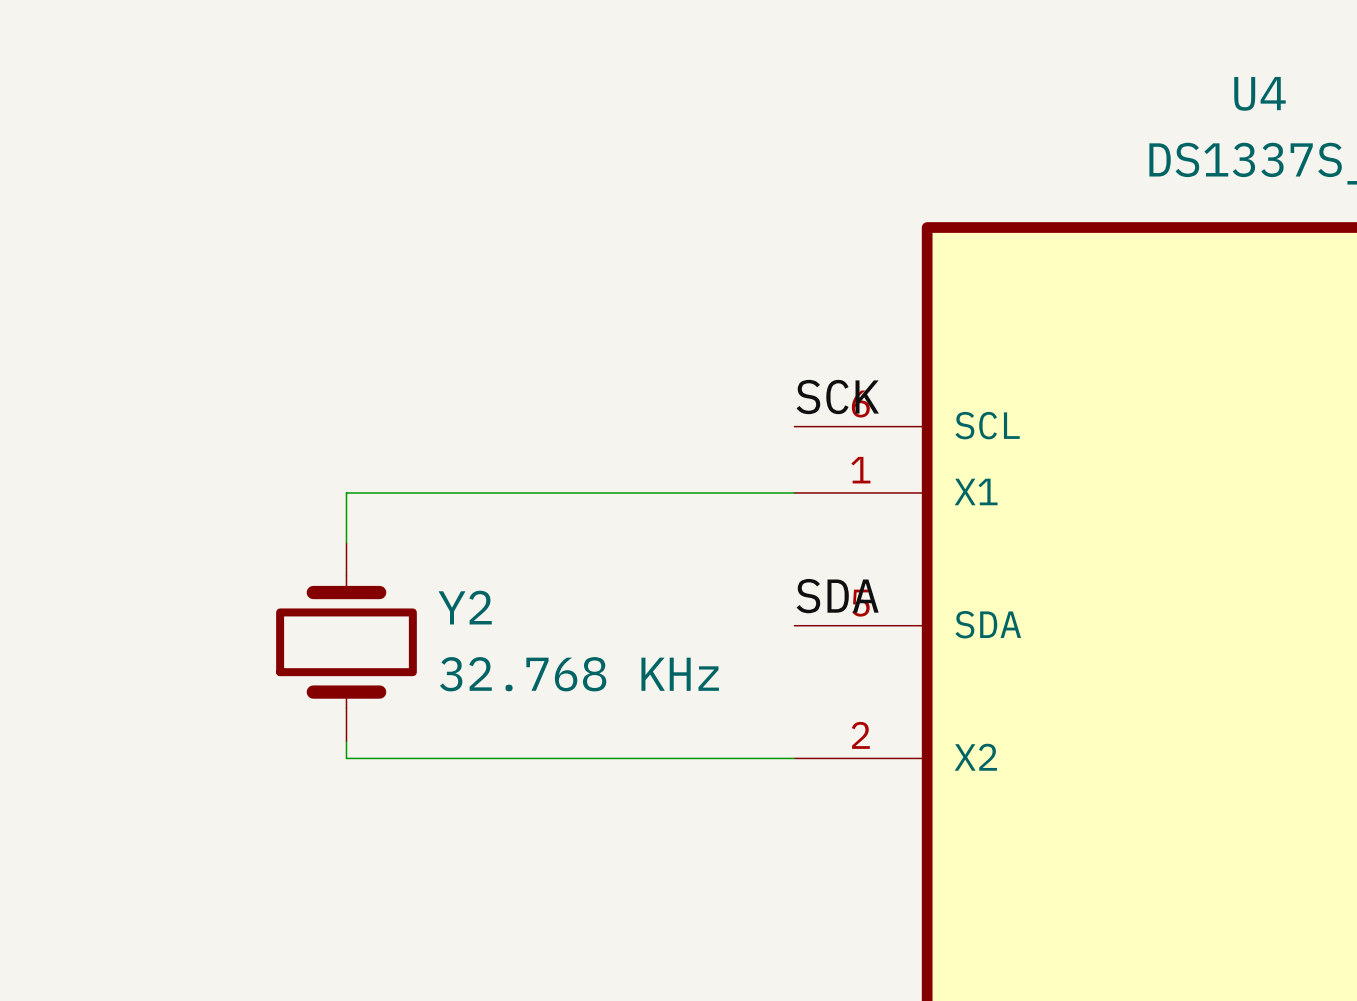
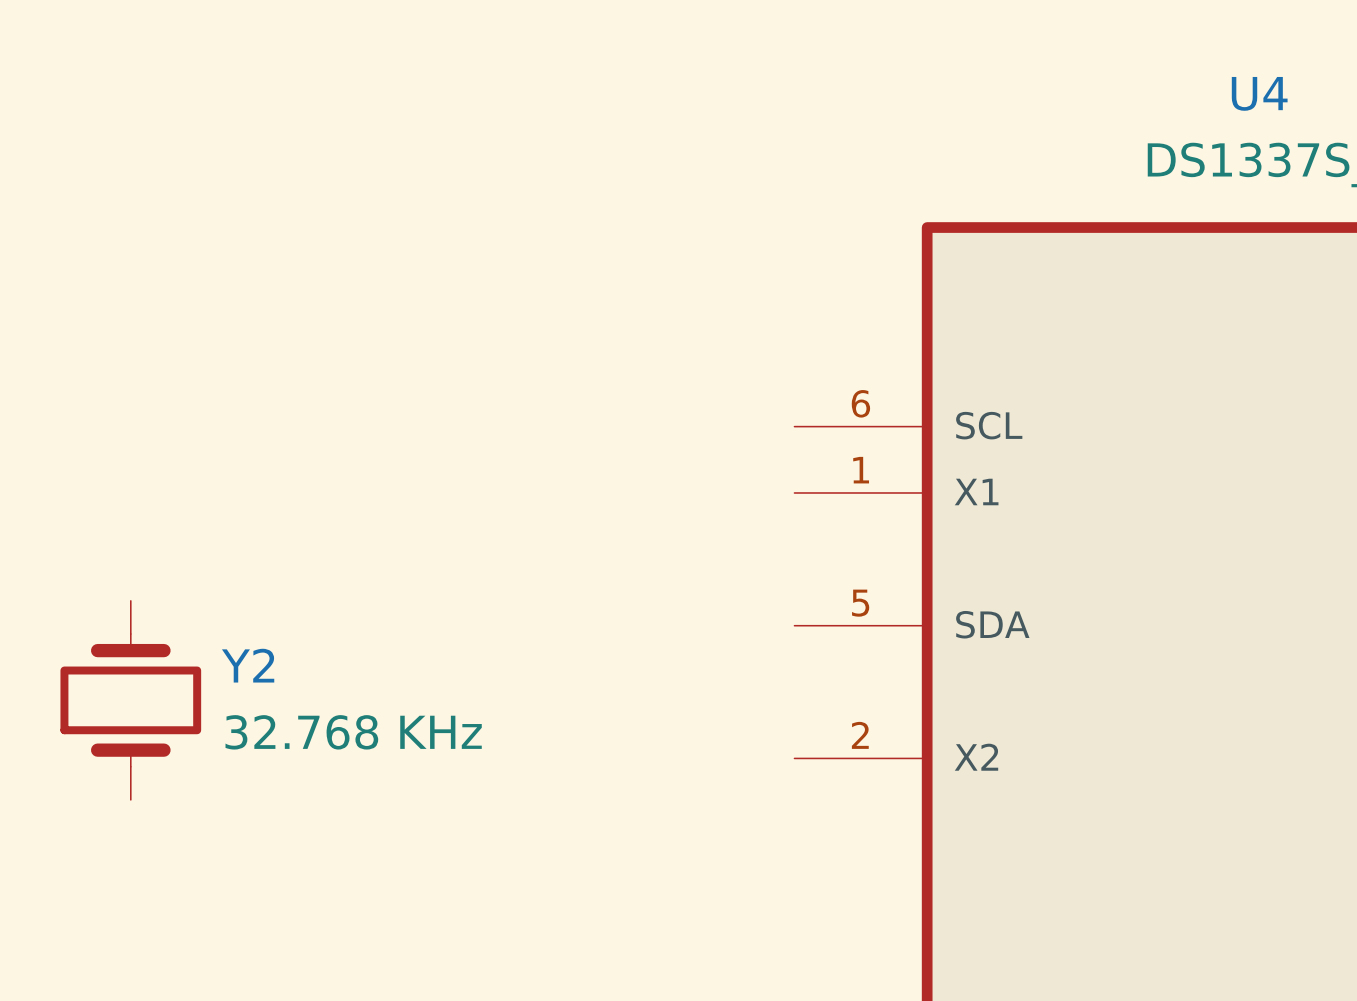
label: SCK (837, 397) -> none
wire: (794, 492) (346, 492) (346, 542) -> none
Y2 symbol: [276, 542, 417, 742] -> [60, 600, 202, 800]
label: SDA (837, 596) -> none
wire: (346, 741) (346, 758) (794, 758) -> none

